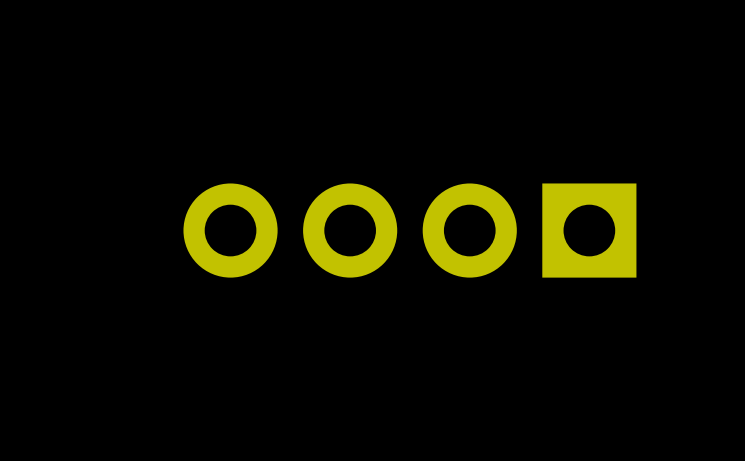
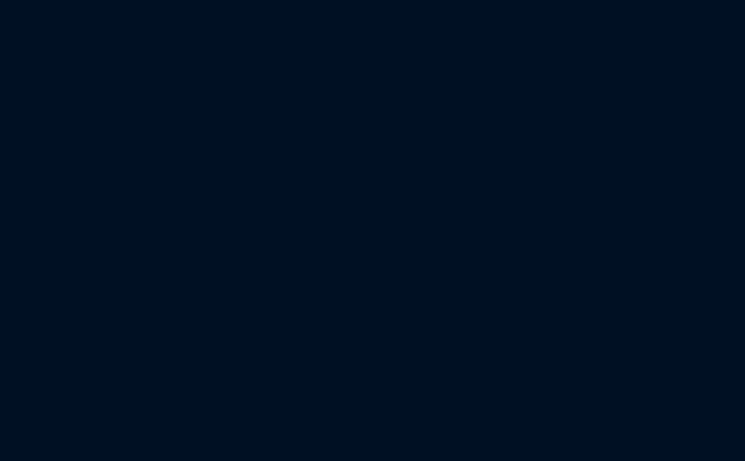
part: (409, 230) -> none

